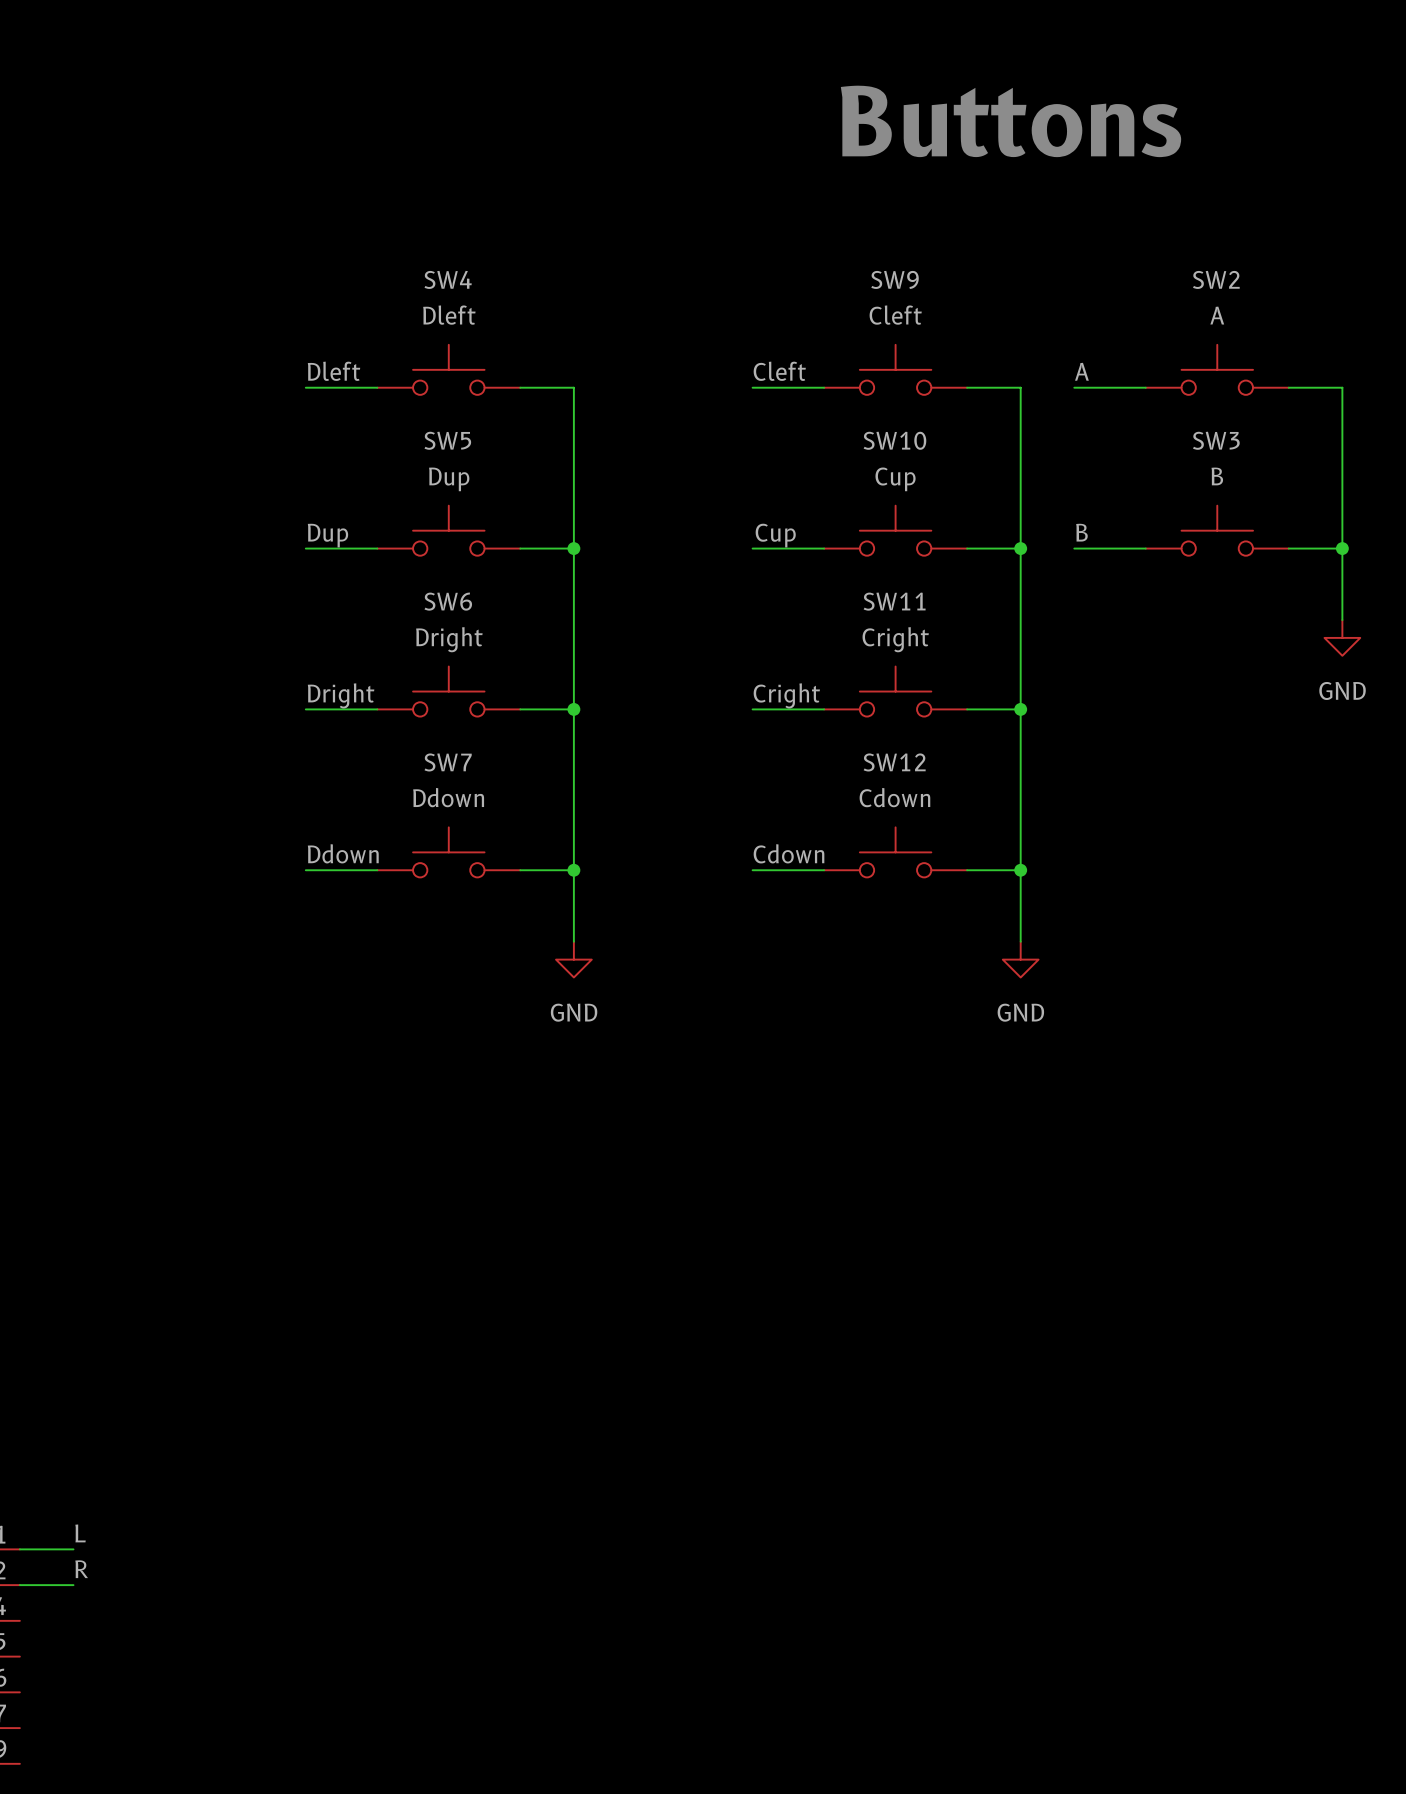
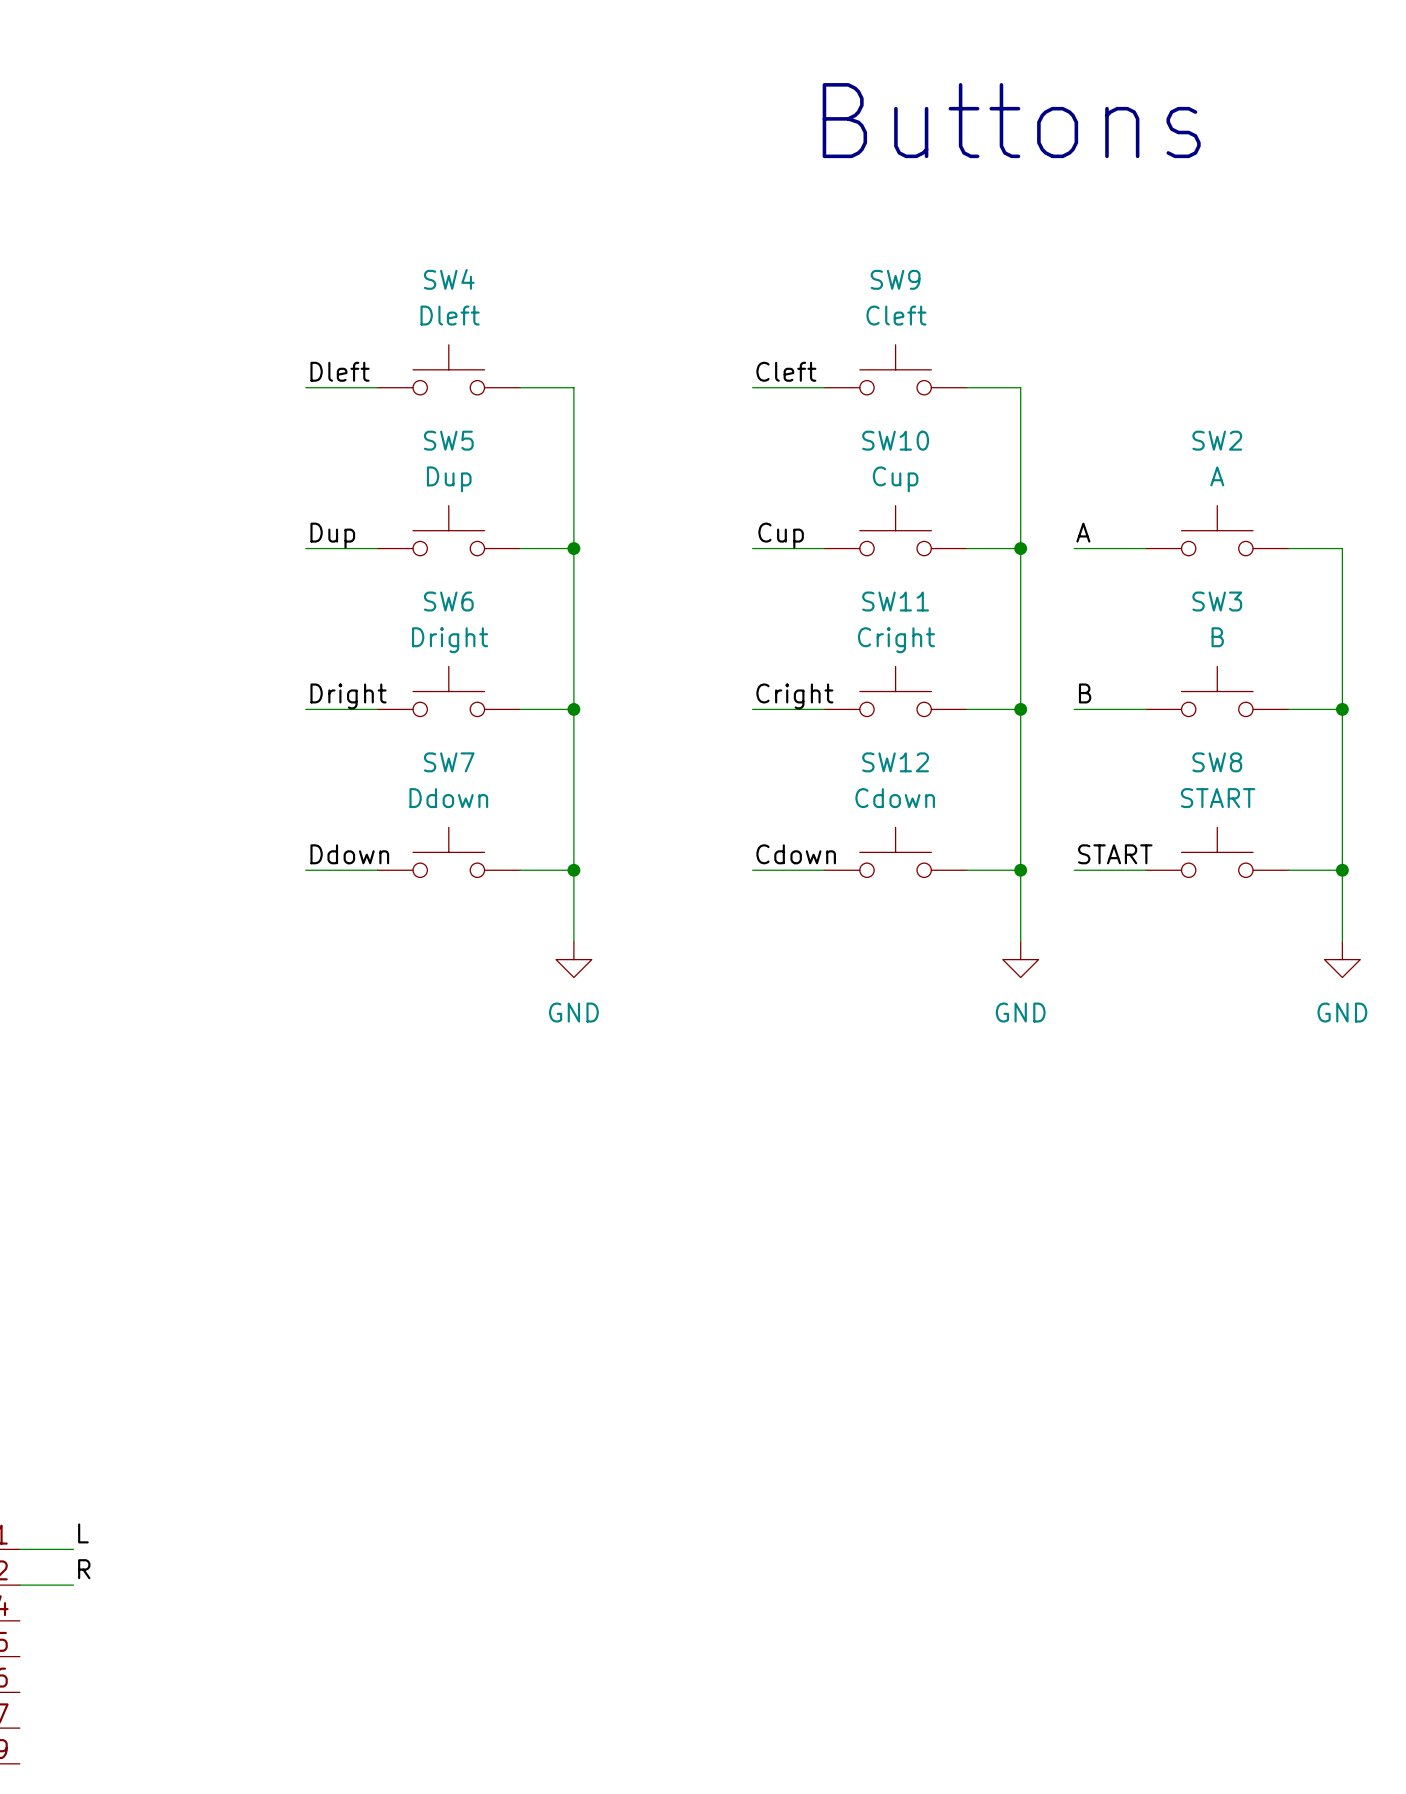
SW2: A (1217, 369) -> none
label: A (1081, 371) -> none
wire: (1074, 387) (1145, 387) -> (1074, 709) (1145, 709)
wire: (1288, 387) (1342, 387) (1342, 548) -> none
SW3 name: SW3 (1216, 440) -> SW2 (1217, 440)
SW3 value: B (1217, 476) -> A (1217, 476)
label: B (1081, 532) -> A (1083, 532)
junction: (1342, 548) -> none
wire: none -> (1342, 620) (1342, 941)
power symbol position: GND (1342, 637) -> GND (1342, 959)
SW3: none -> B (1217, 691)
label: none -> B (1085, 693)
wire: none -> (1288, 709) (1342, 709)
junction: none -> (1342, 709)
SW8: none -> START (1217, 852)
label: none -> START (1115, 854)
wire: none -> (1074, 870) (1145, 870)
wire: none -> (1288, 870) (1342, 870)
junction: none -> (1342, 870)

